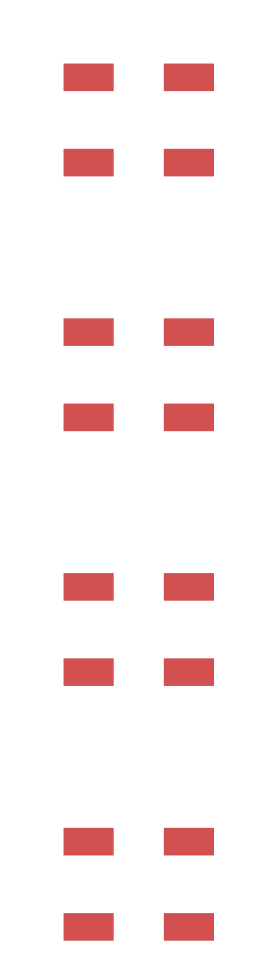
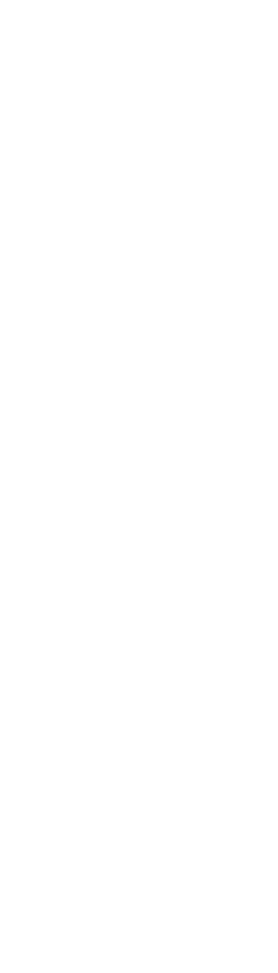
part: (138, 119) -> none
part: (138, 374) -> none
part: (138, 629) -> none
part: (138, 884) -> none

